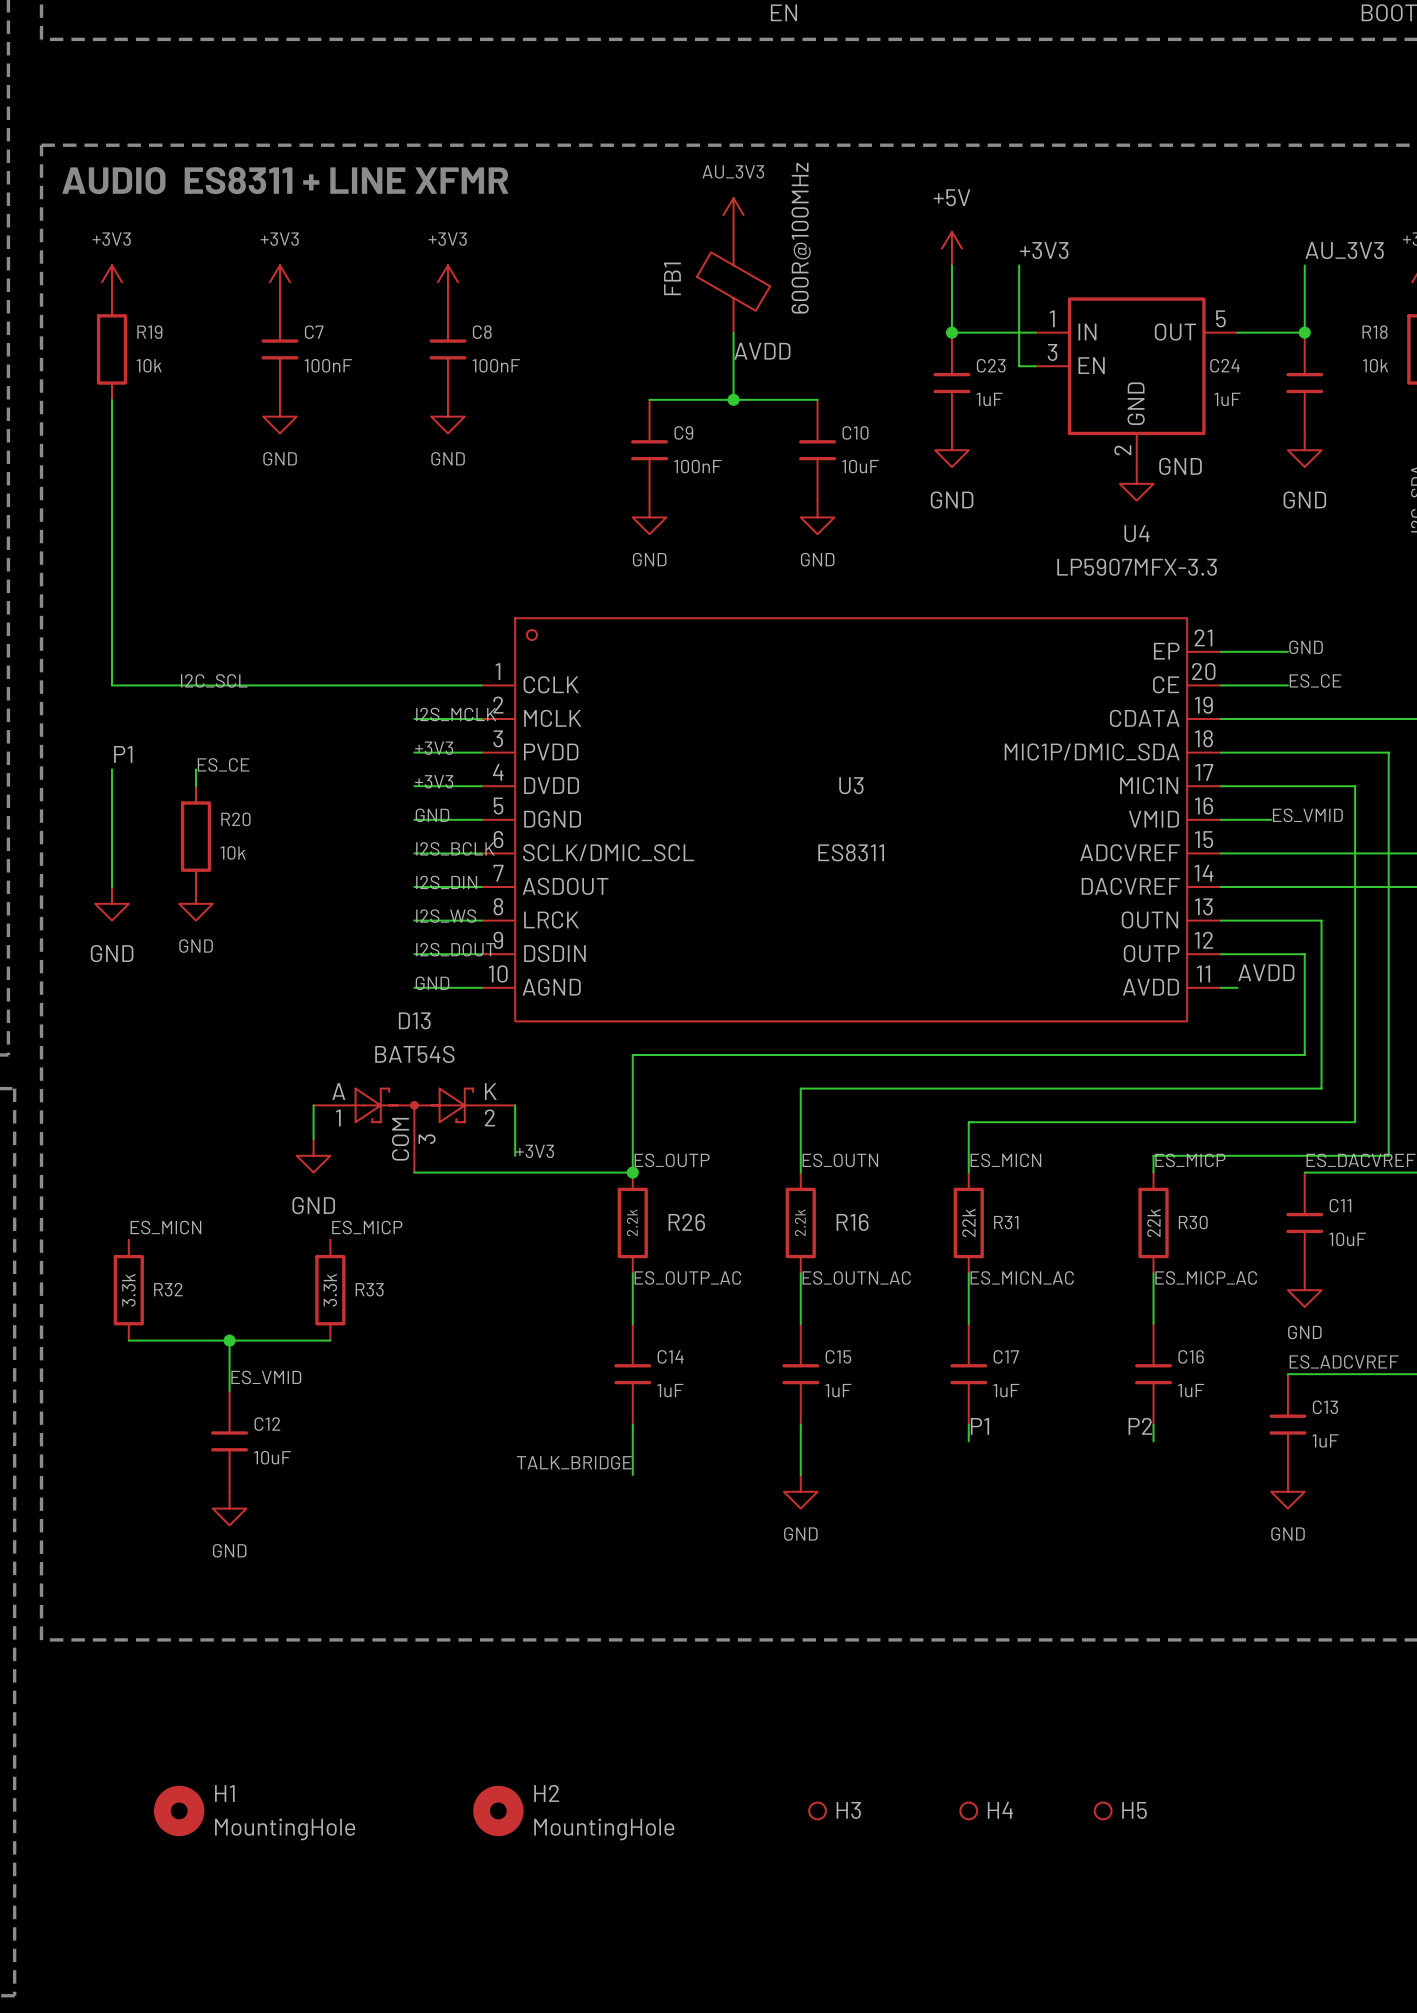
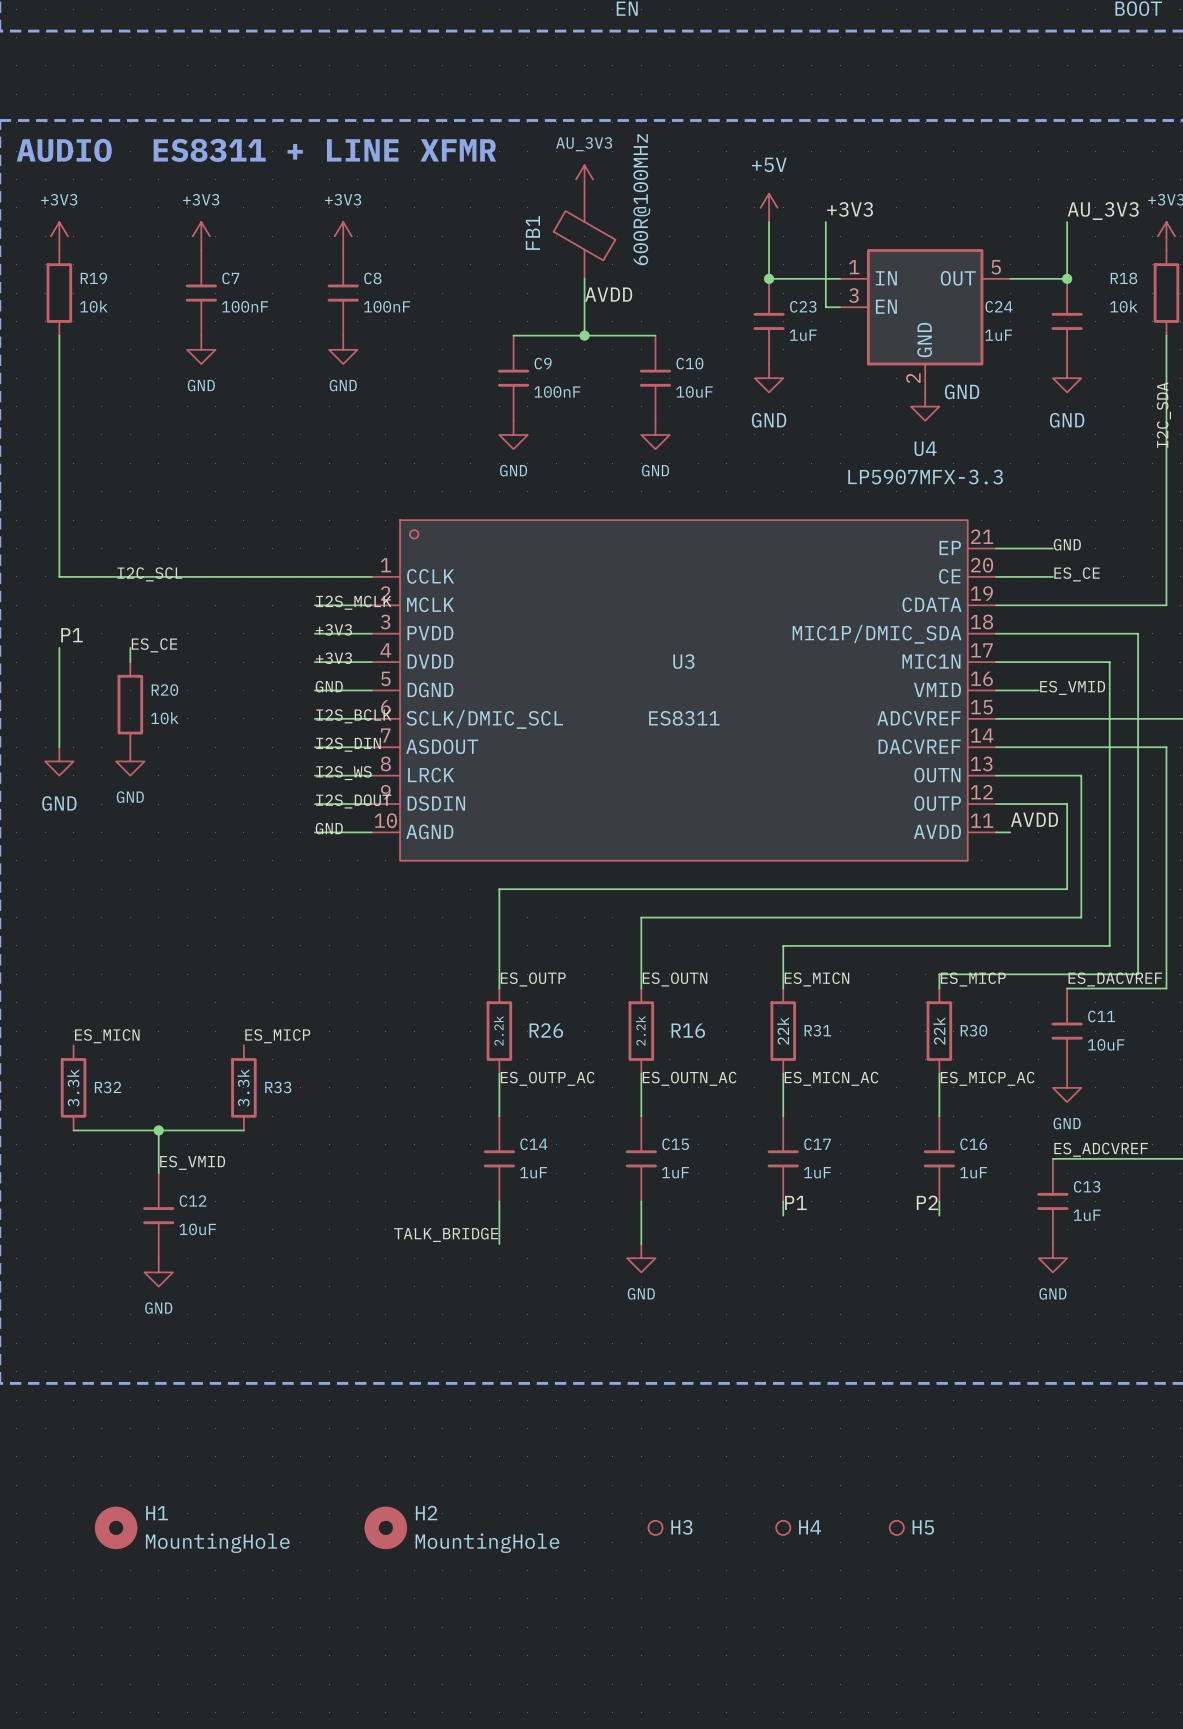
wire: (313, 1105) (313, 1138) -> none
wire: (515, 1105) (515, 1155) -> none
D13: BAT54S (414, 1130) -> none
label: +3V3 (534, 1151) -> none
power symbol: GND (313, 1155) -> none
wire: (414, 1172) (632, 1172) -> none
junction: (632, 1172) -> none

